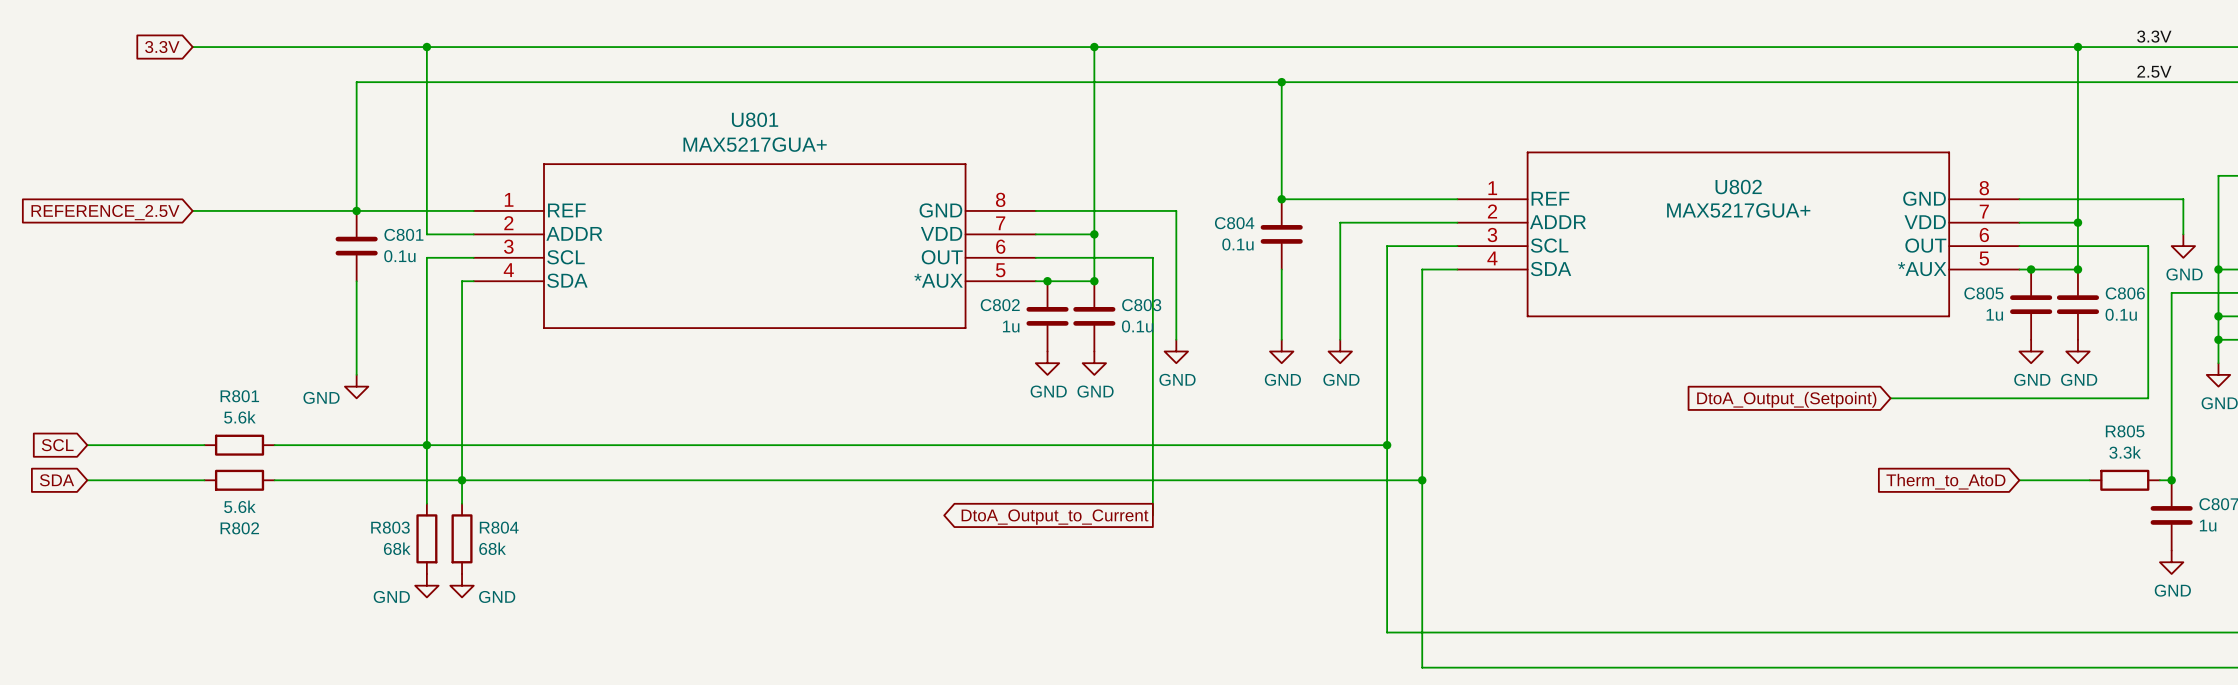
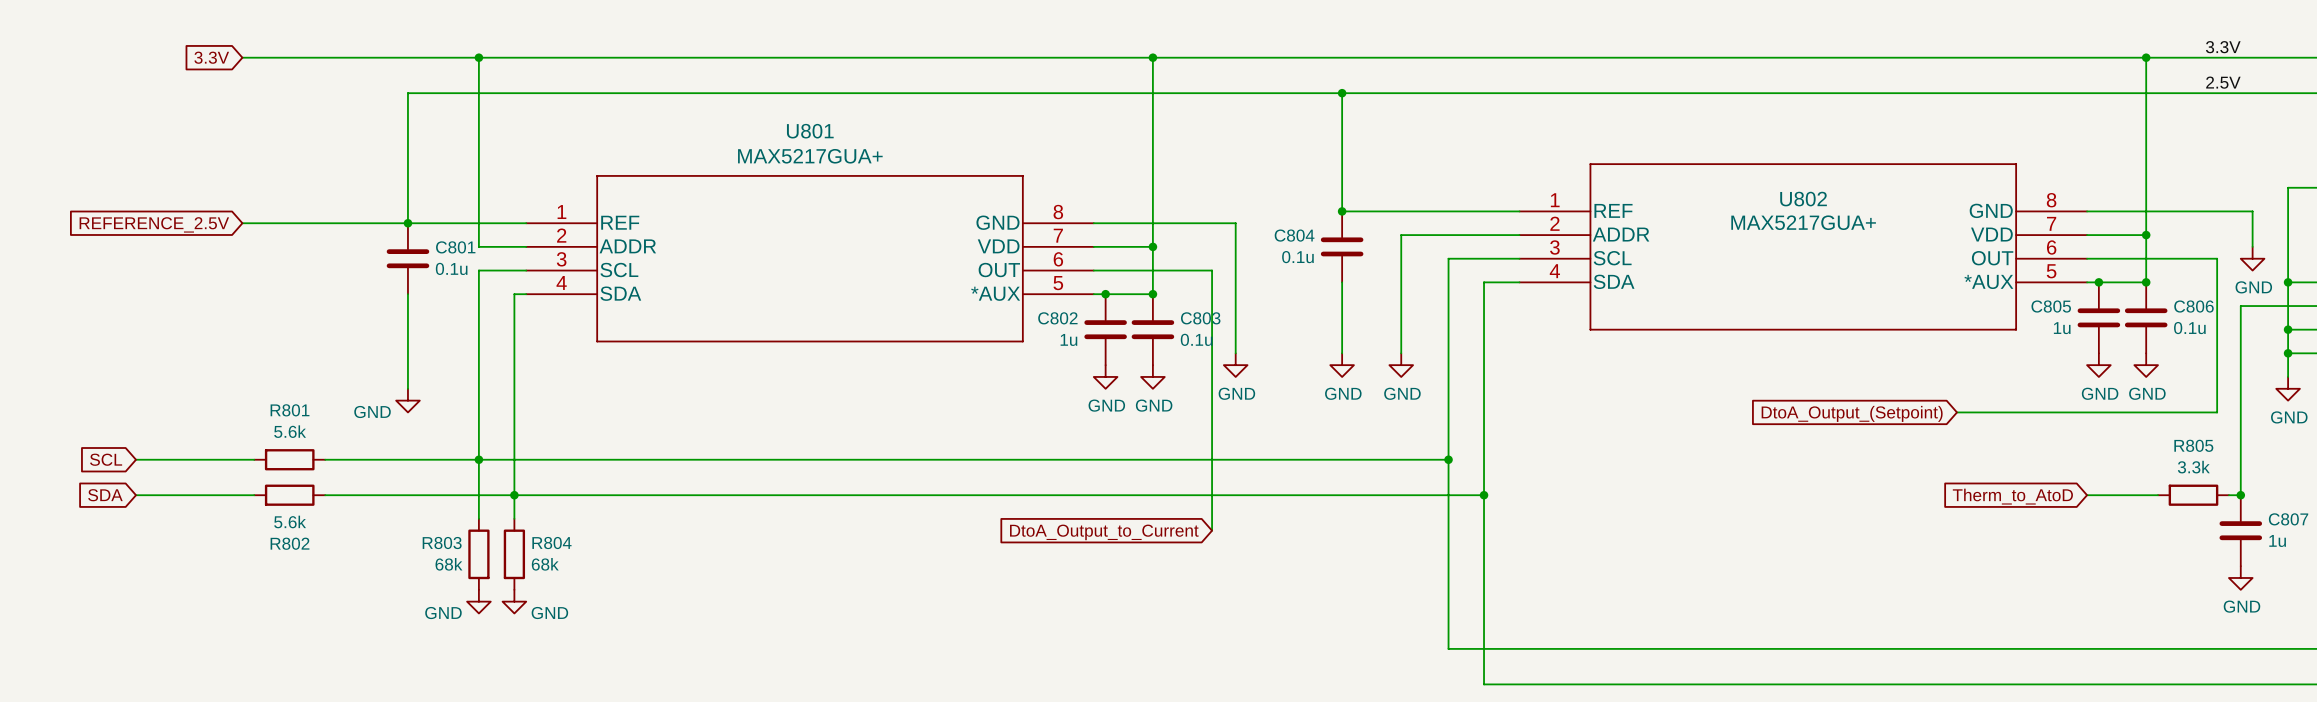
global label shape: output (1055, 517) -> input (1104, 532)

